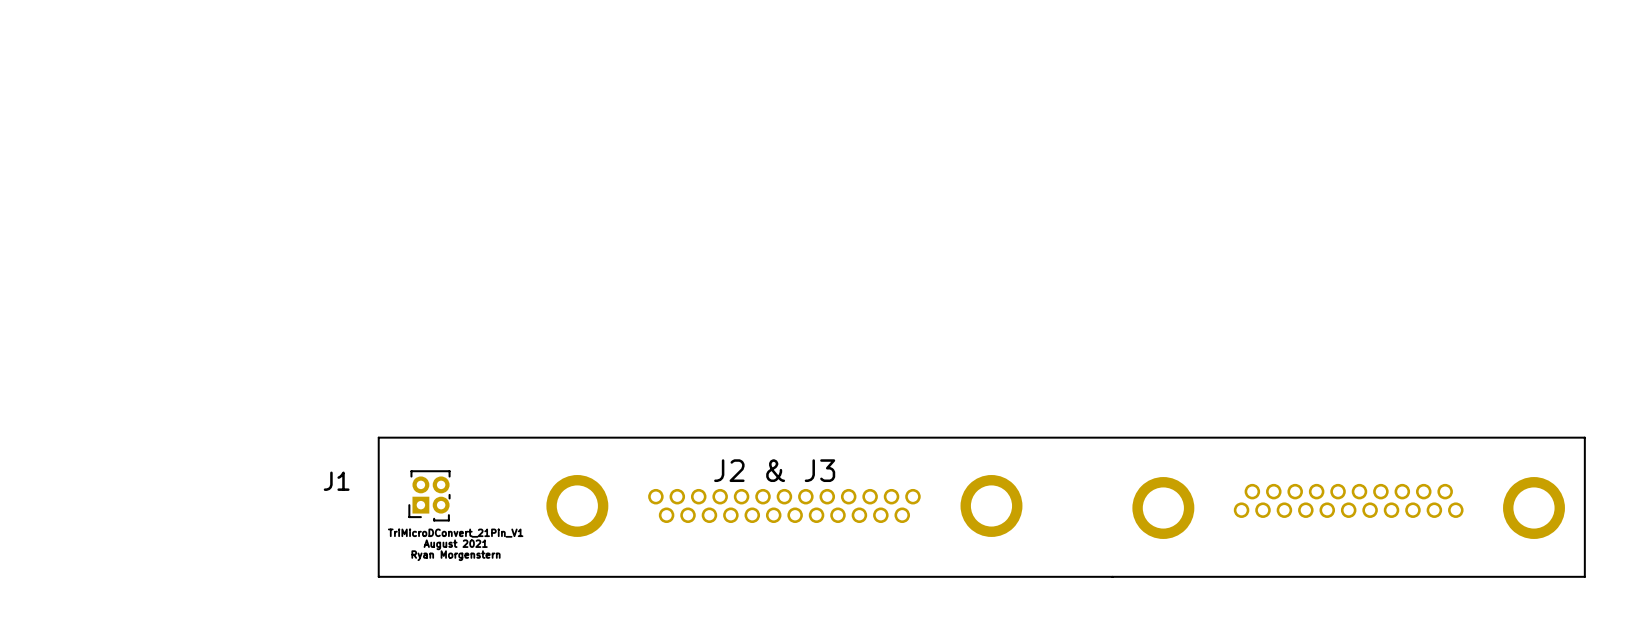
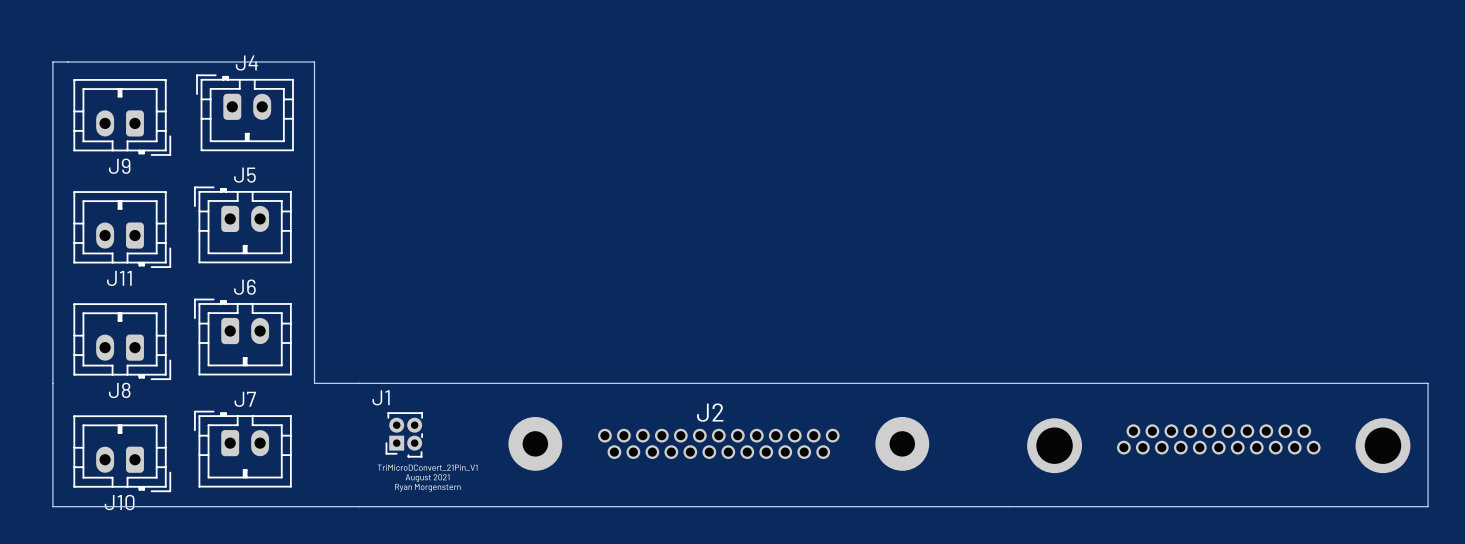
J4: none -> (245, 112)
J9: none -> (122, 117)
J5: none -> (242, 224)
J11: none -> (122, 229)
J6: none -> (242, 337)
J8: none -> (122, 341)
board edge: (378, 437) (378, 576) -> (359, 383) (314, 383) (314, 61) (52, 61) (52, 506) (359, 506)
J1 name position: J1 (336, 481) -> J1 (381, 397)
J2 & J3: (784, 505) -> none
J2: none -> (718, 443)
J7: none -> (242, 449)
J10: none -> (122, 453)

